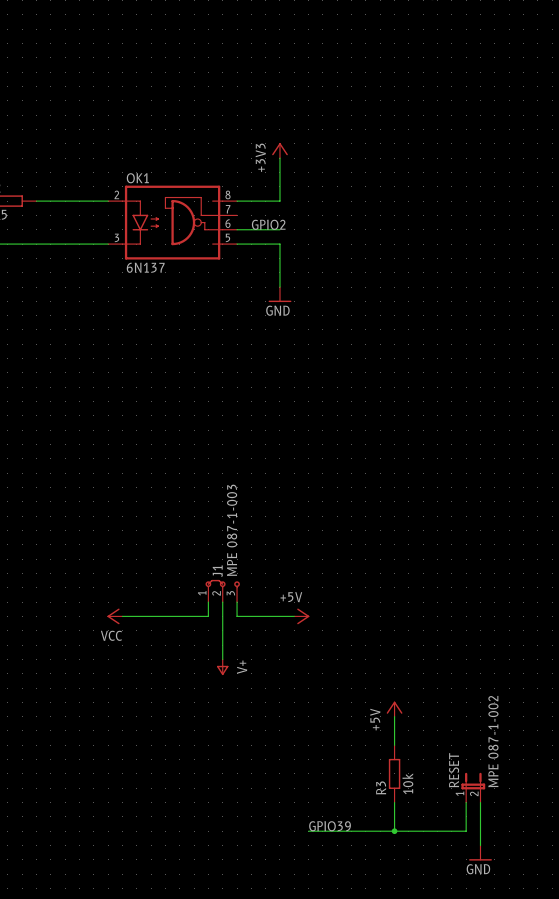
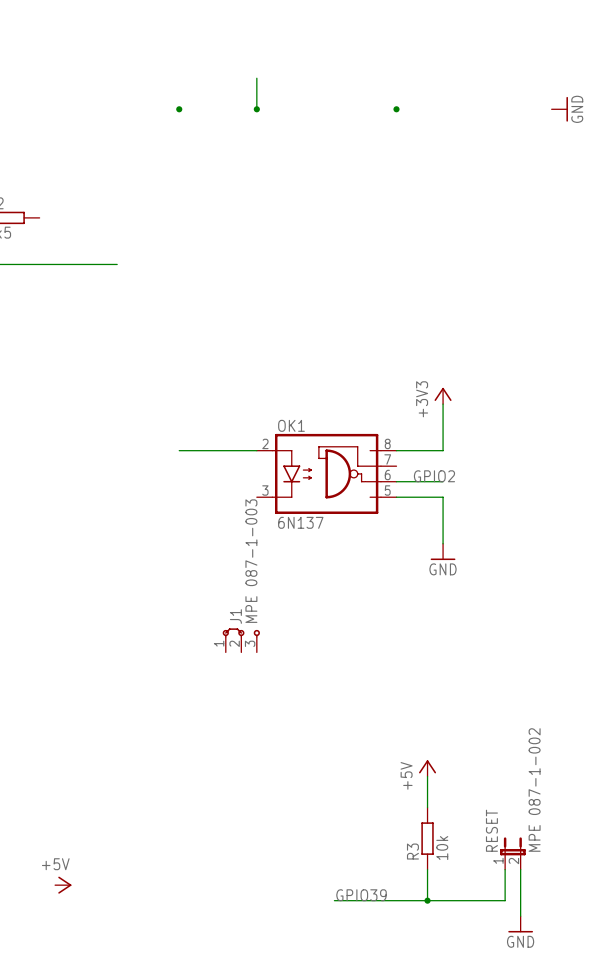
wire: none -> (256, 78) (256, 109)
junction: none -> (179, 109)
junction: none -> (256, 109)
junction: none -> (396, 109)
power symbol: none -> GND (559, 109)
power symbol: +3V3 (279, 150) -> none
wire: (279, 158) (279, 201) (237, 201) -> none
wire: (36, 201) (108, 201) -> none
OK1 position: (172, 222) -> (326, 473)
label: GPIO2 (268, 224) -> none
wire: (237, 229) (279, 229) -> none
wire: (237, 244) (279, 244) (279, 287) -> none
power symbol: GND (279, 294) -> none
power symbol: none -> +3V3 (443, 395)
wire: none -> (443, 404) (443, 450) (396, 450)
wire: none -> (179, 450) (256, 450)
label: none -> GPIO2 (434, 476)
wire: none -> (396, 481) (443, 481)
wire: none -> (396, 497) (443, 497) (443, 543)
power symbol: none -> GND (443, 551)
wire: (208, 602) (208, 616) (122, 616) -> none
wire: (222, 602) (222, 659) -> none
wire: (237, 602) (237, 616) (294, 616) -> none
power symbol: VCC (114, 616) -> none
power symbol: +5V (301, 616) -> none
power symbol: V+ (222, 667) -> none
power symbol: none -> +5V (63, 885)

